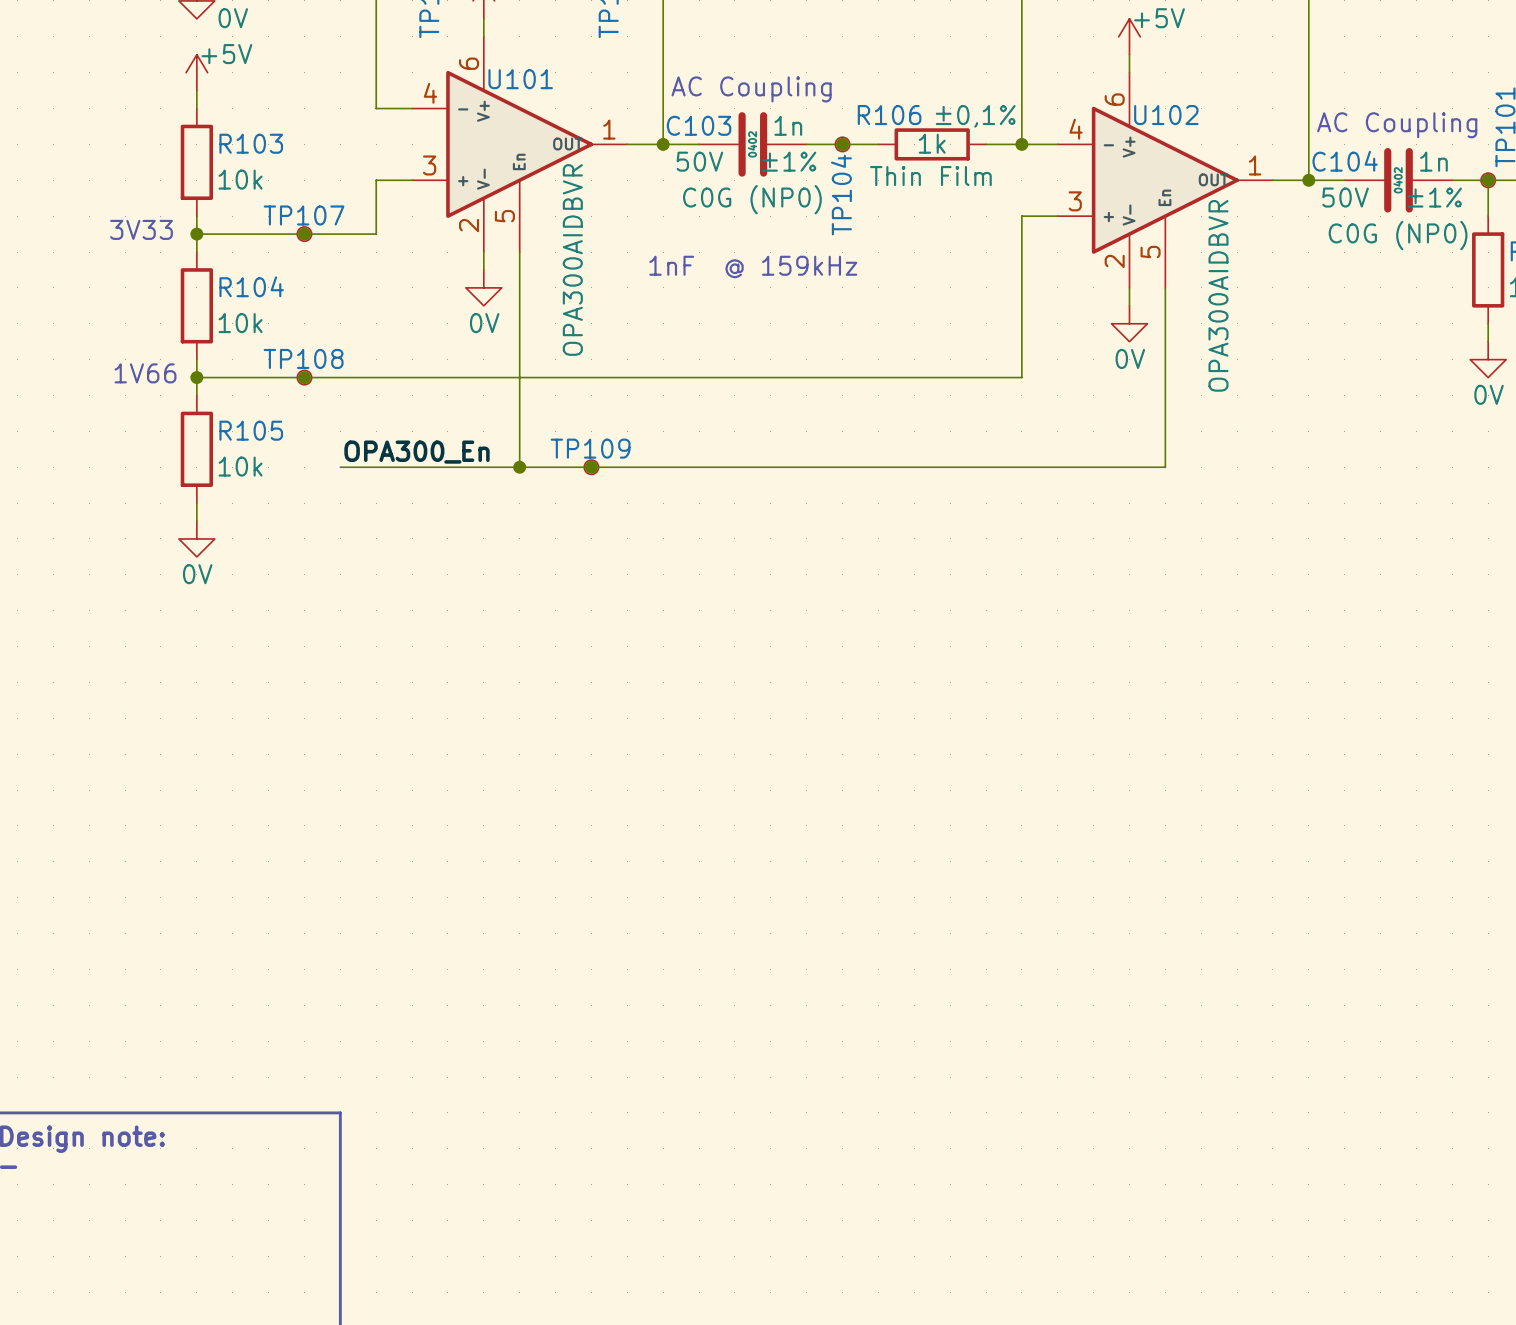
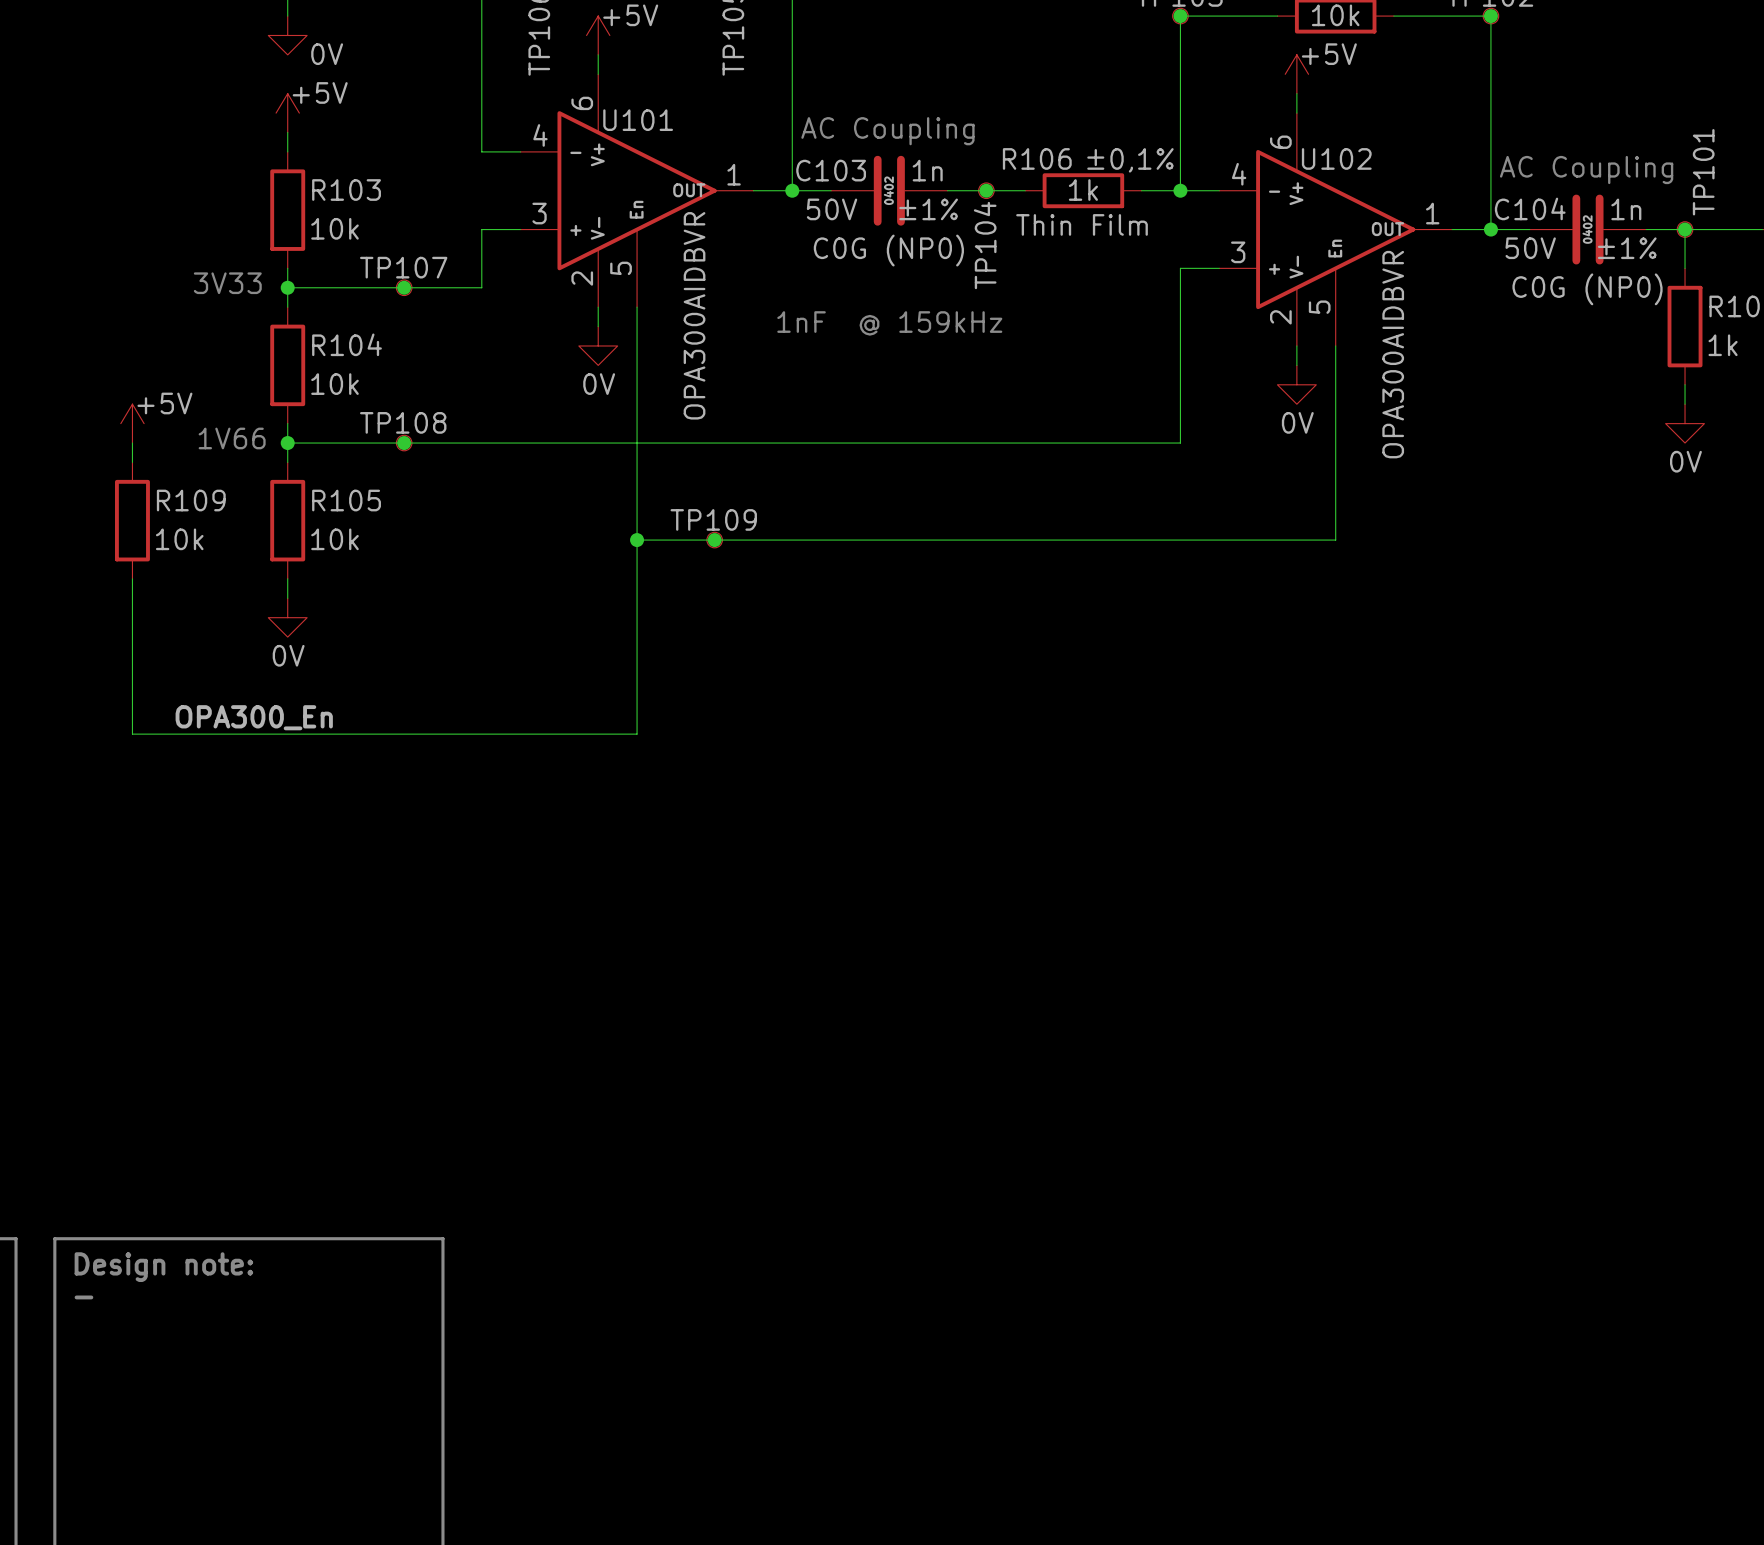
power symbol: none -> +5V (132, 423)
wire: none -> (132, 443) (132, 462)
R109: none -> 10k (132, 520)
label position: OPA300_En (417, 452) -> OPA300_En (254, 717)
wire: (340, 467) (519, 467) -> (132, 578) (132, 734) (637, 734) (637, 540)

